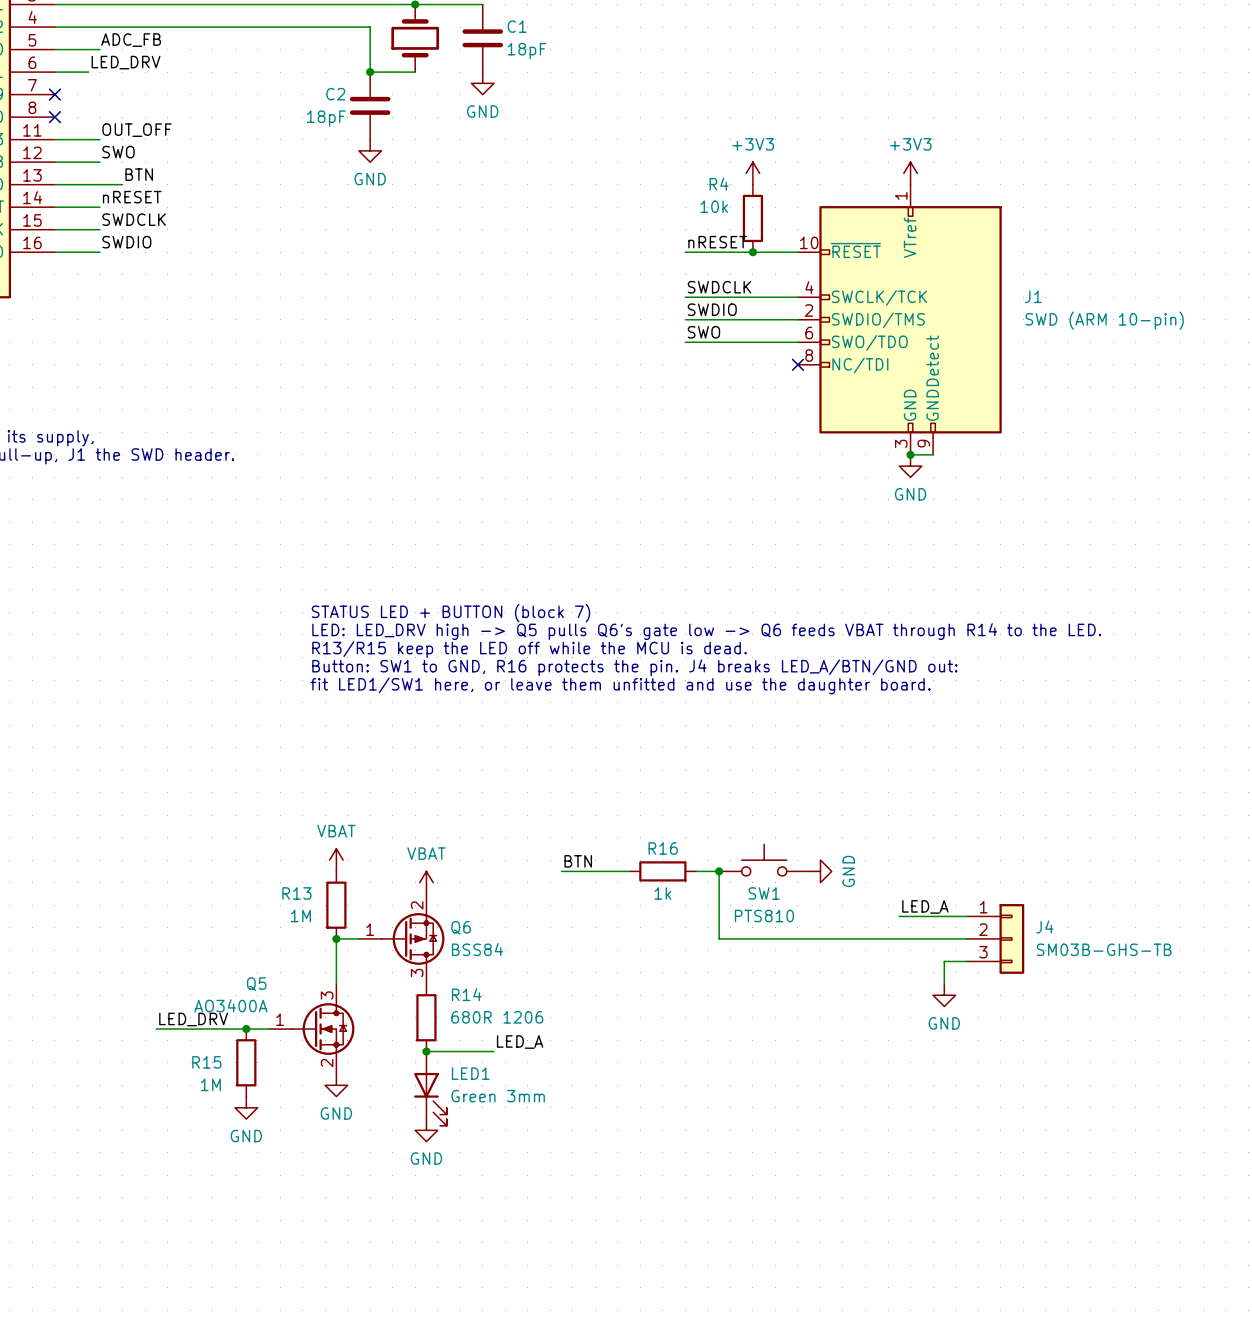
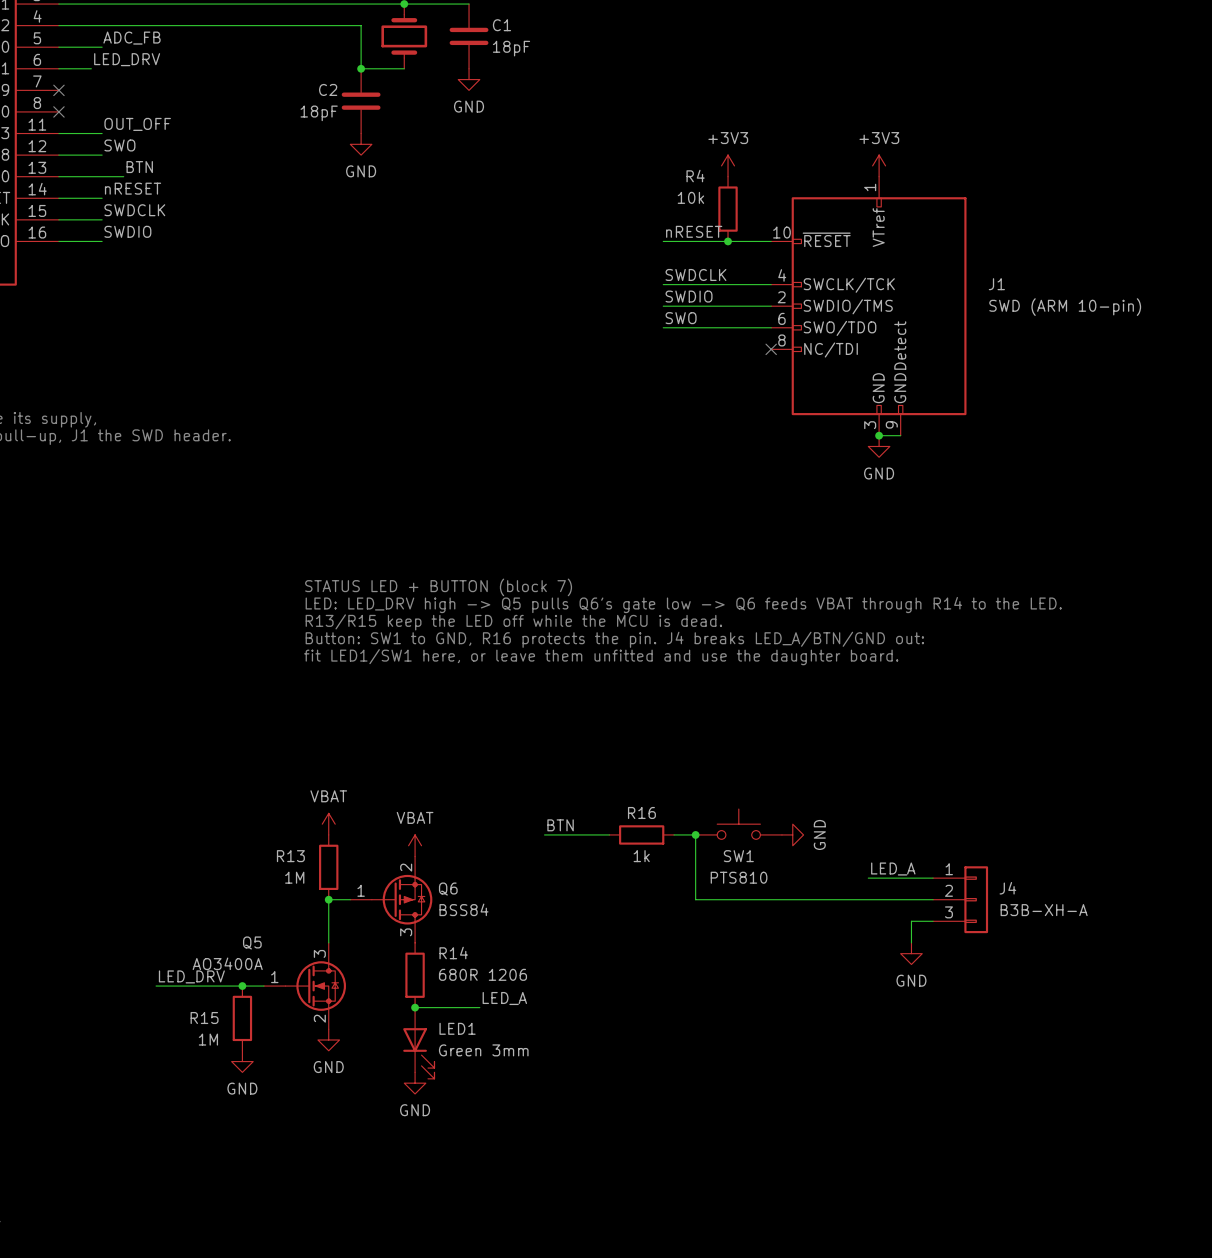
J4 value: SM03B-GHS-TB (1104, 949) -> B3B-XH-A (1044, 910)

